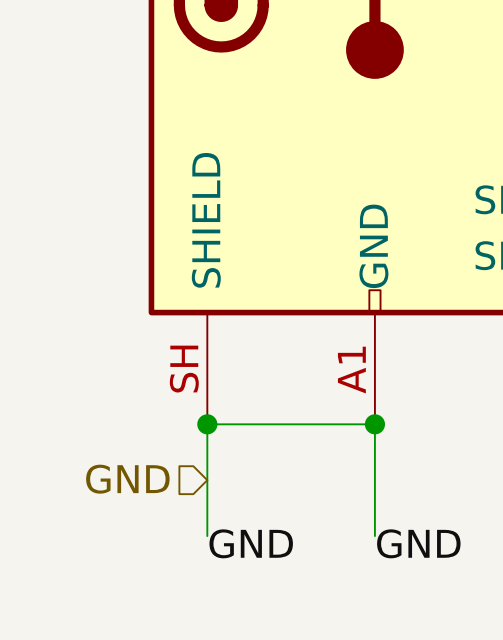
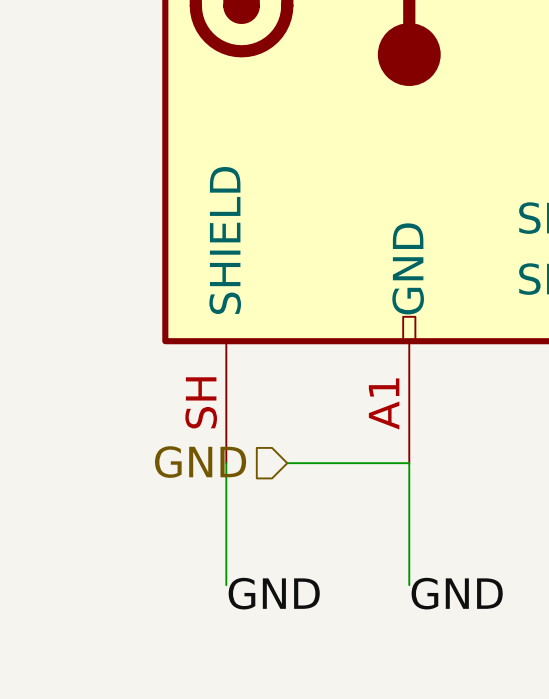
wire: (207, 424) (263, 424) -> none
junction: (207, 424) -> none
junction: (374, 424) -> none
hierarchical label position: GND (127, 479) -> GND (200, 462)

